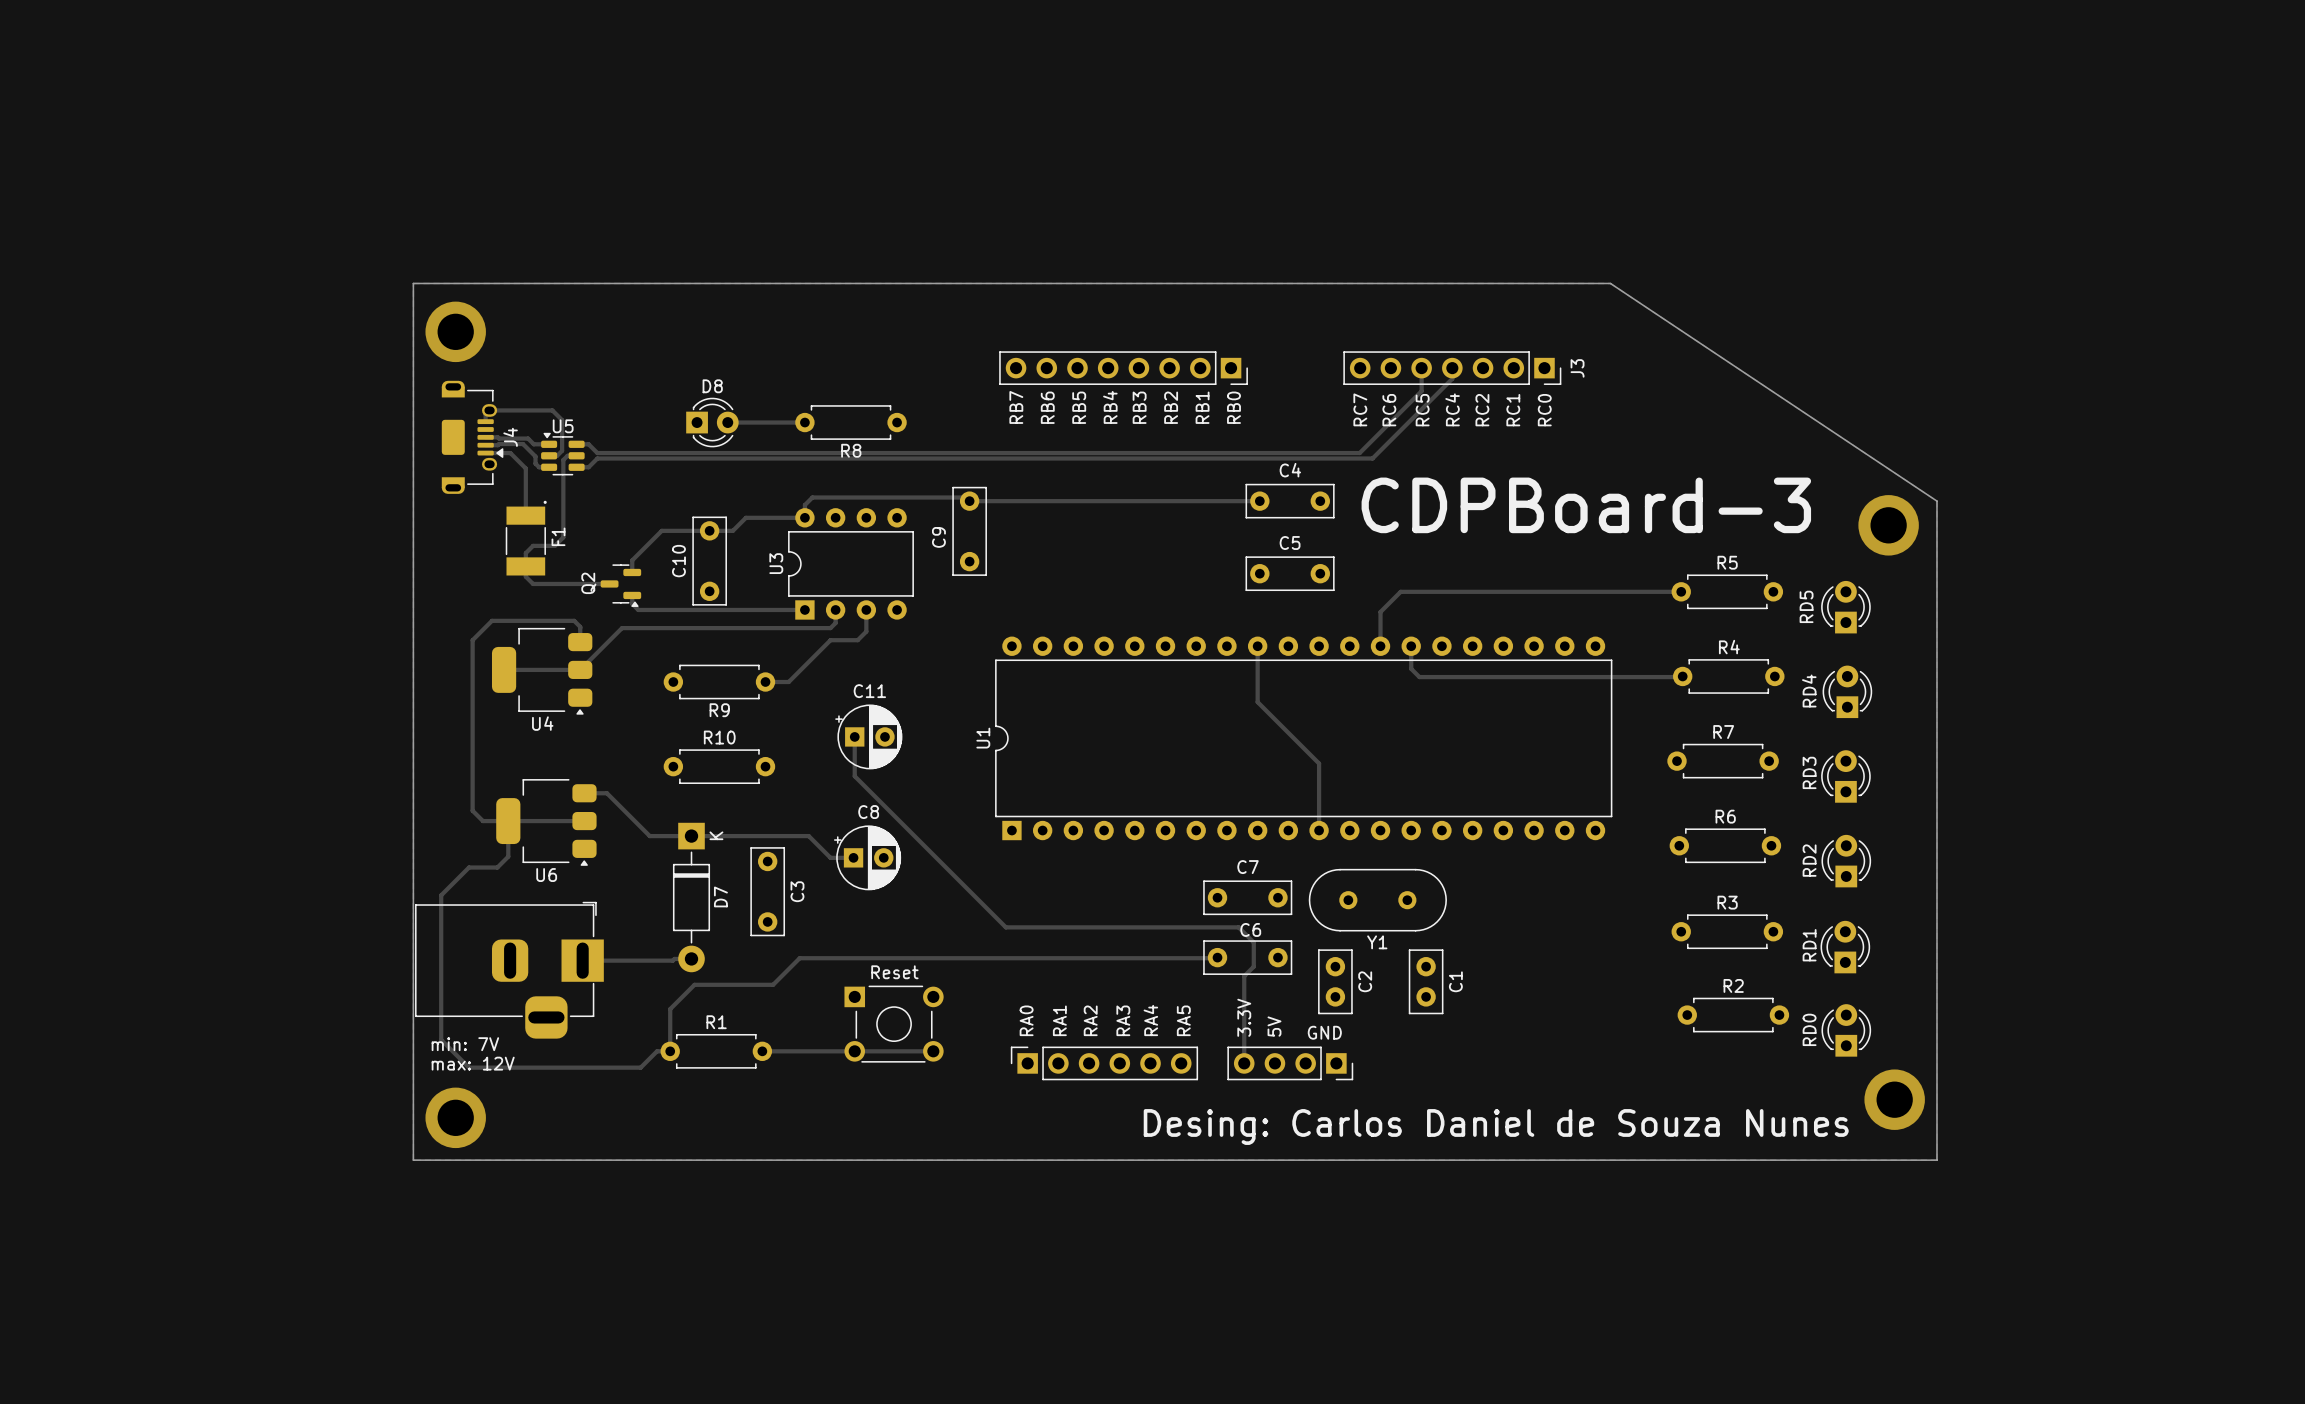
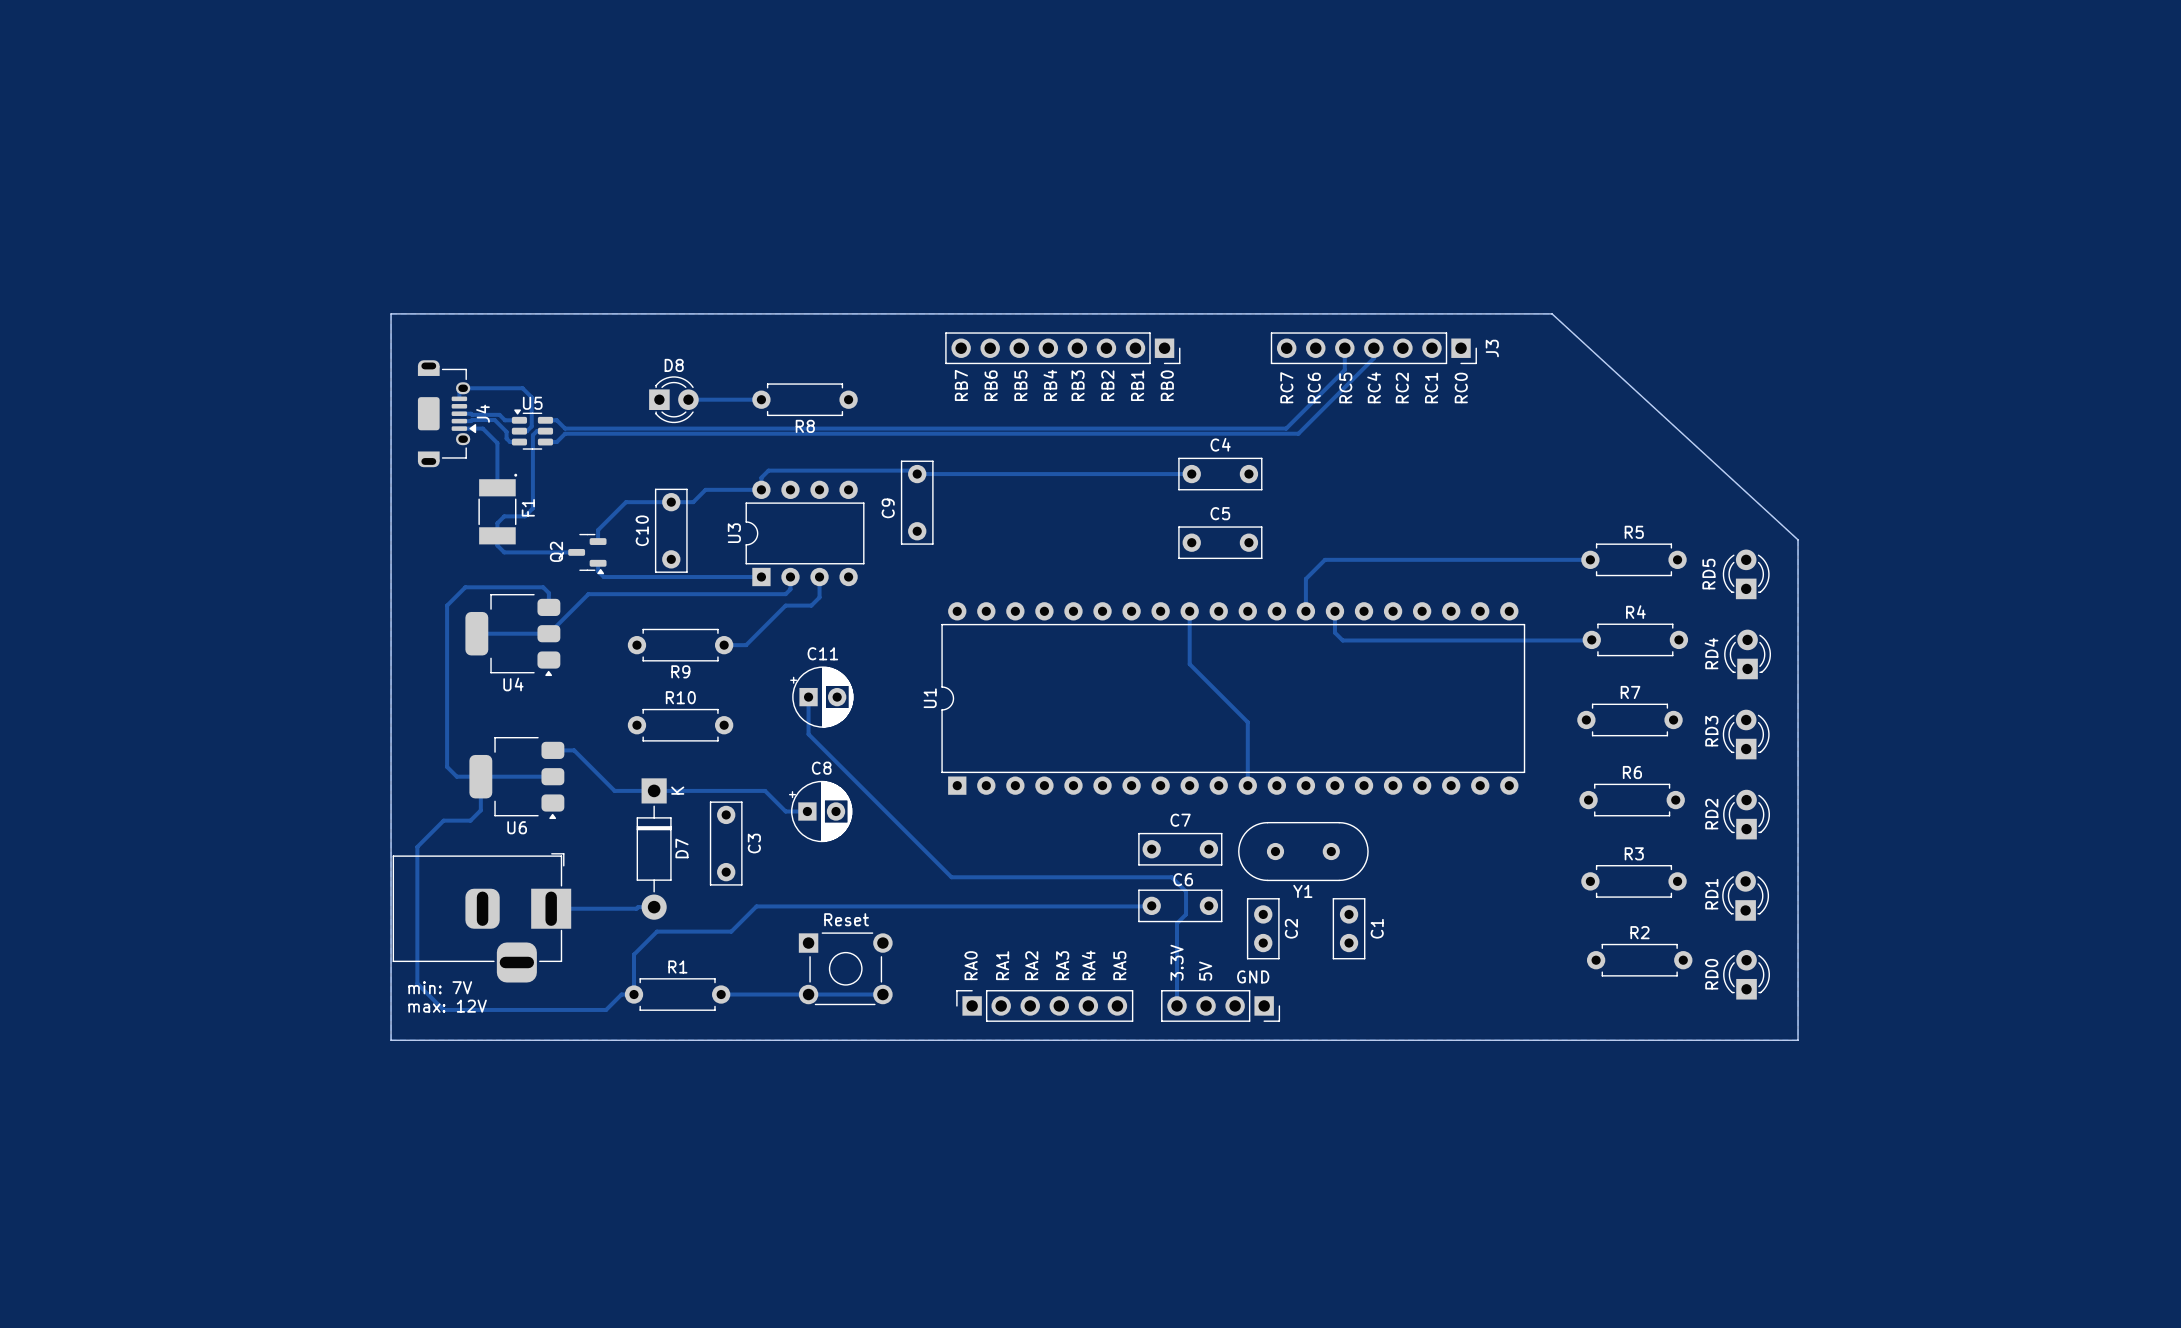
board edge: (413, 331) (413, 283) (1610, 283) (1936, 501) (1936, 1160) (413, 1160) (413, 1099) -> (391, 313) (1552, 313) (1798, 539) (1798, 1040) (391, 1040)
via: (455, 331) -> none
text: CDPBoard-3 (1586, 505) -> none
via: (1888, 525) -> none
via: (1894, 1099) -> none
via: (455, 1117) -> none
text: Desing: Carlos Daniel de Souza Nunes (1496, 1127) -> none

